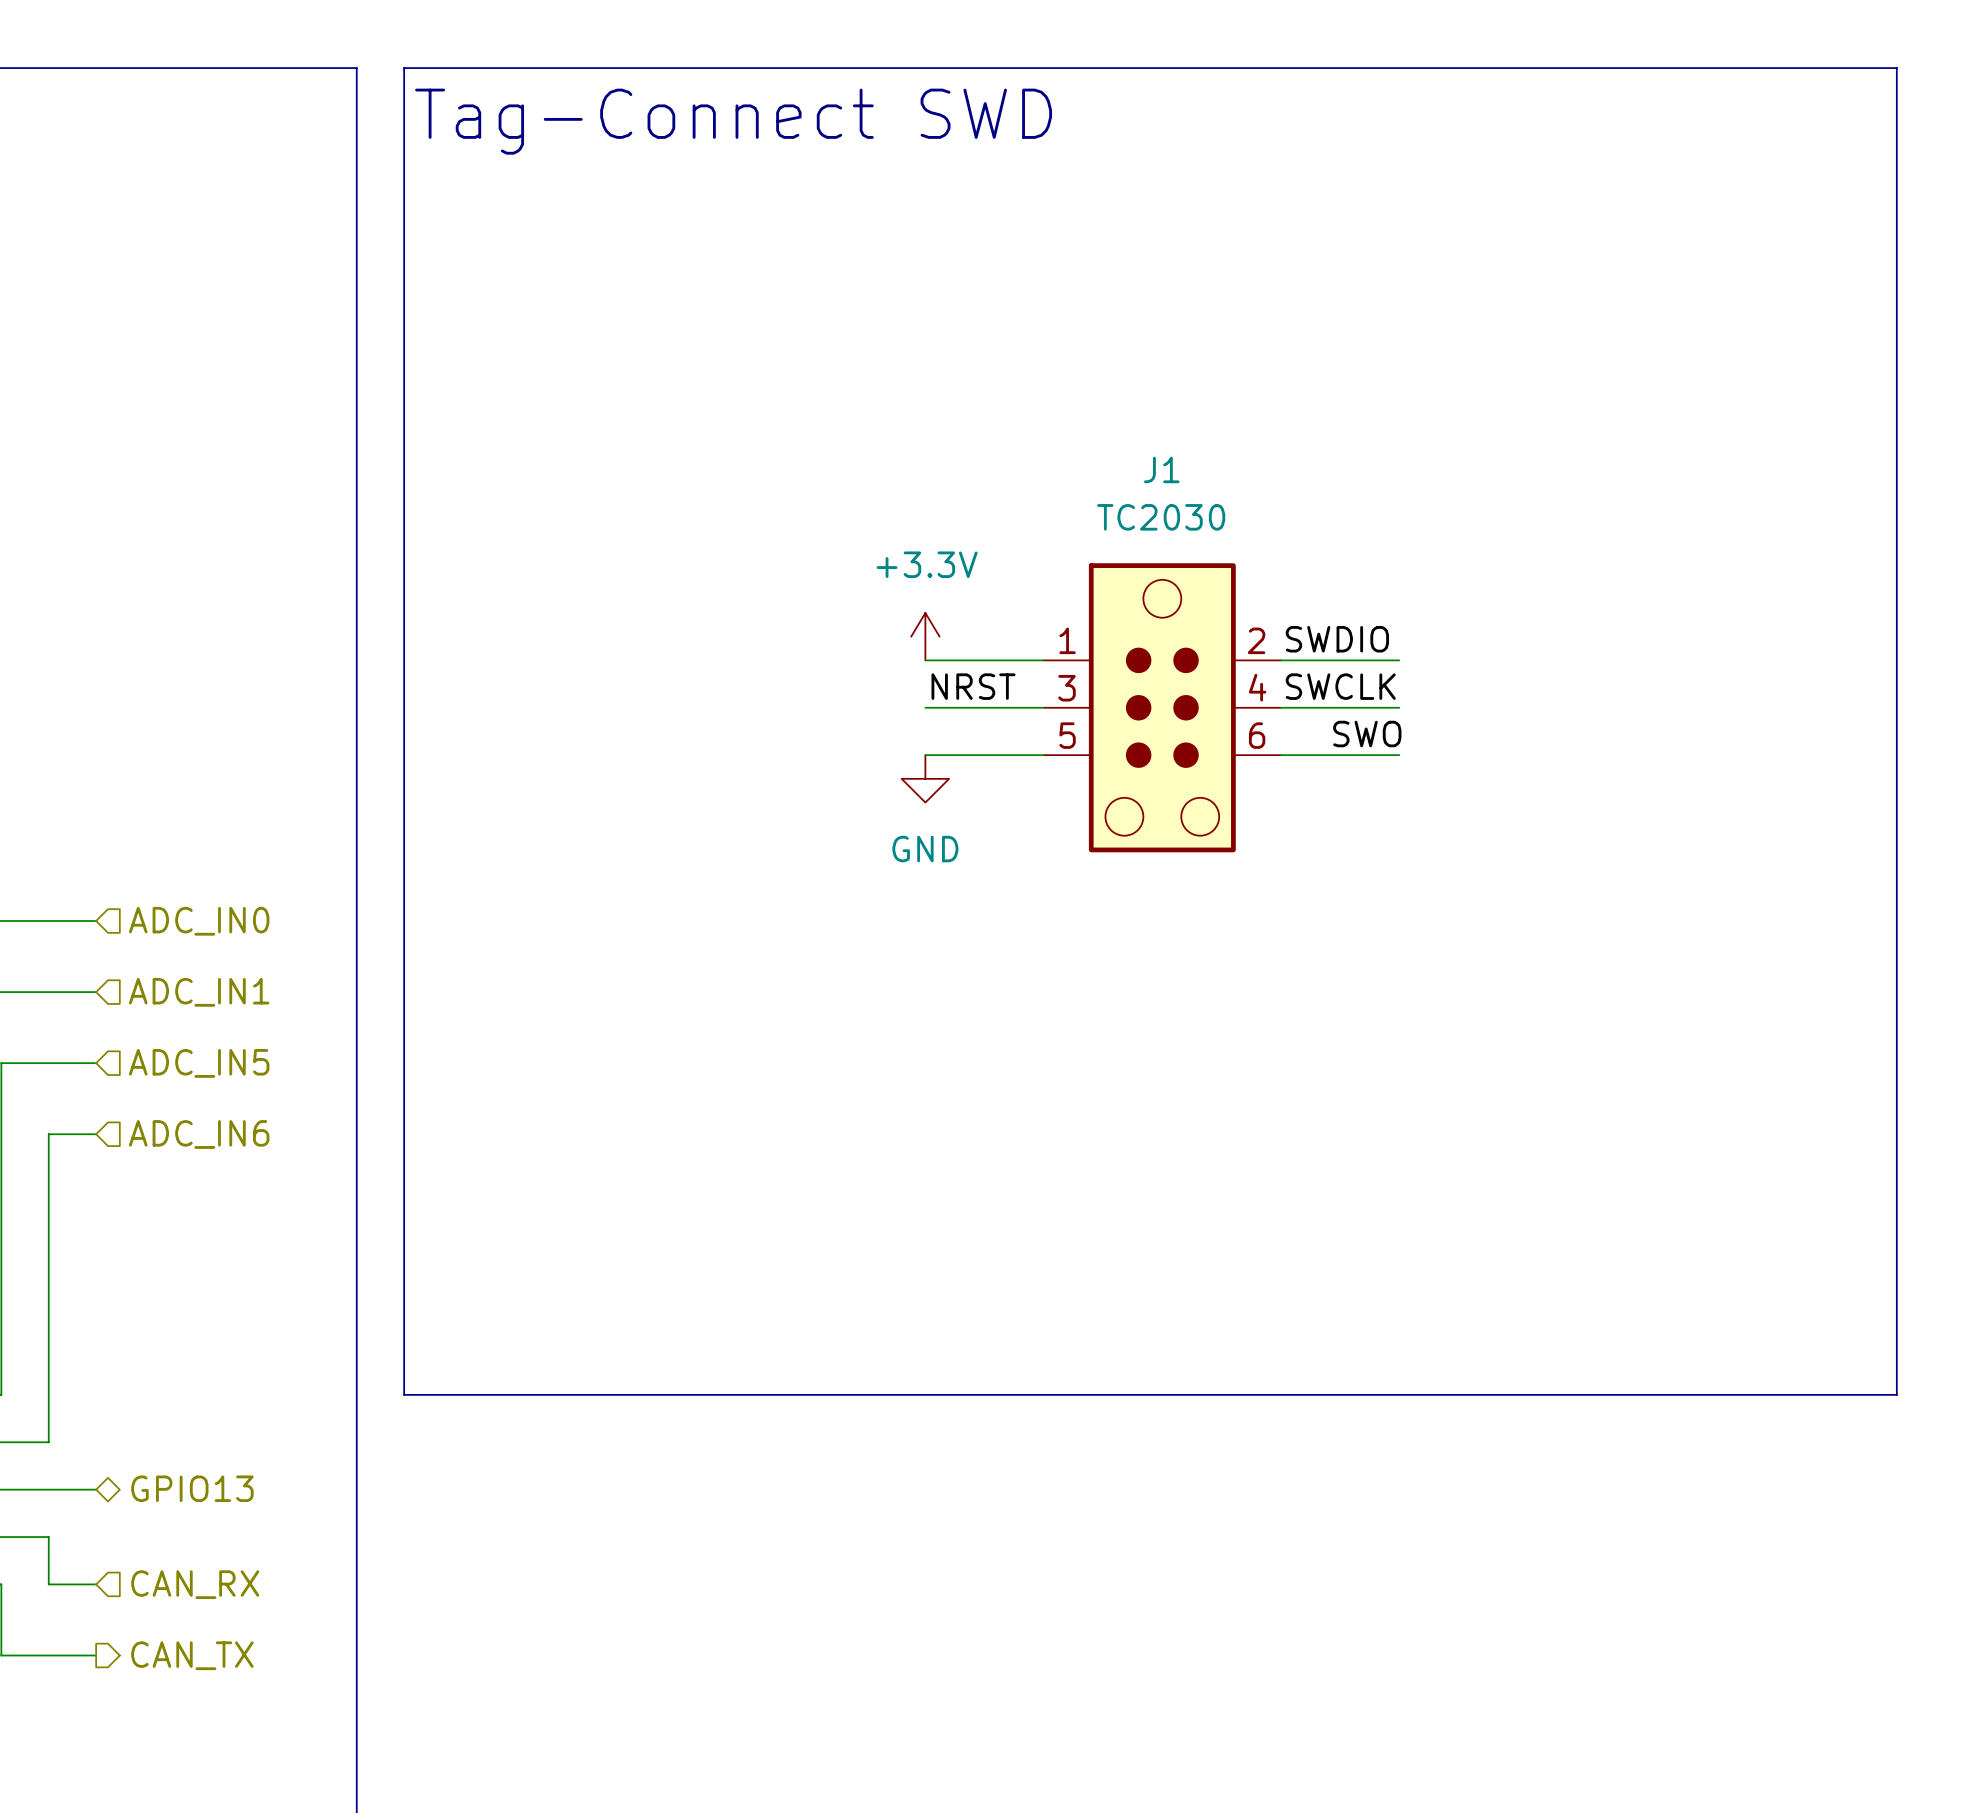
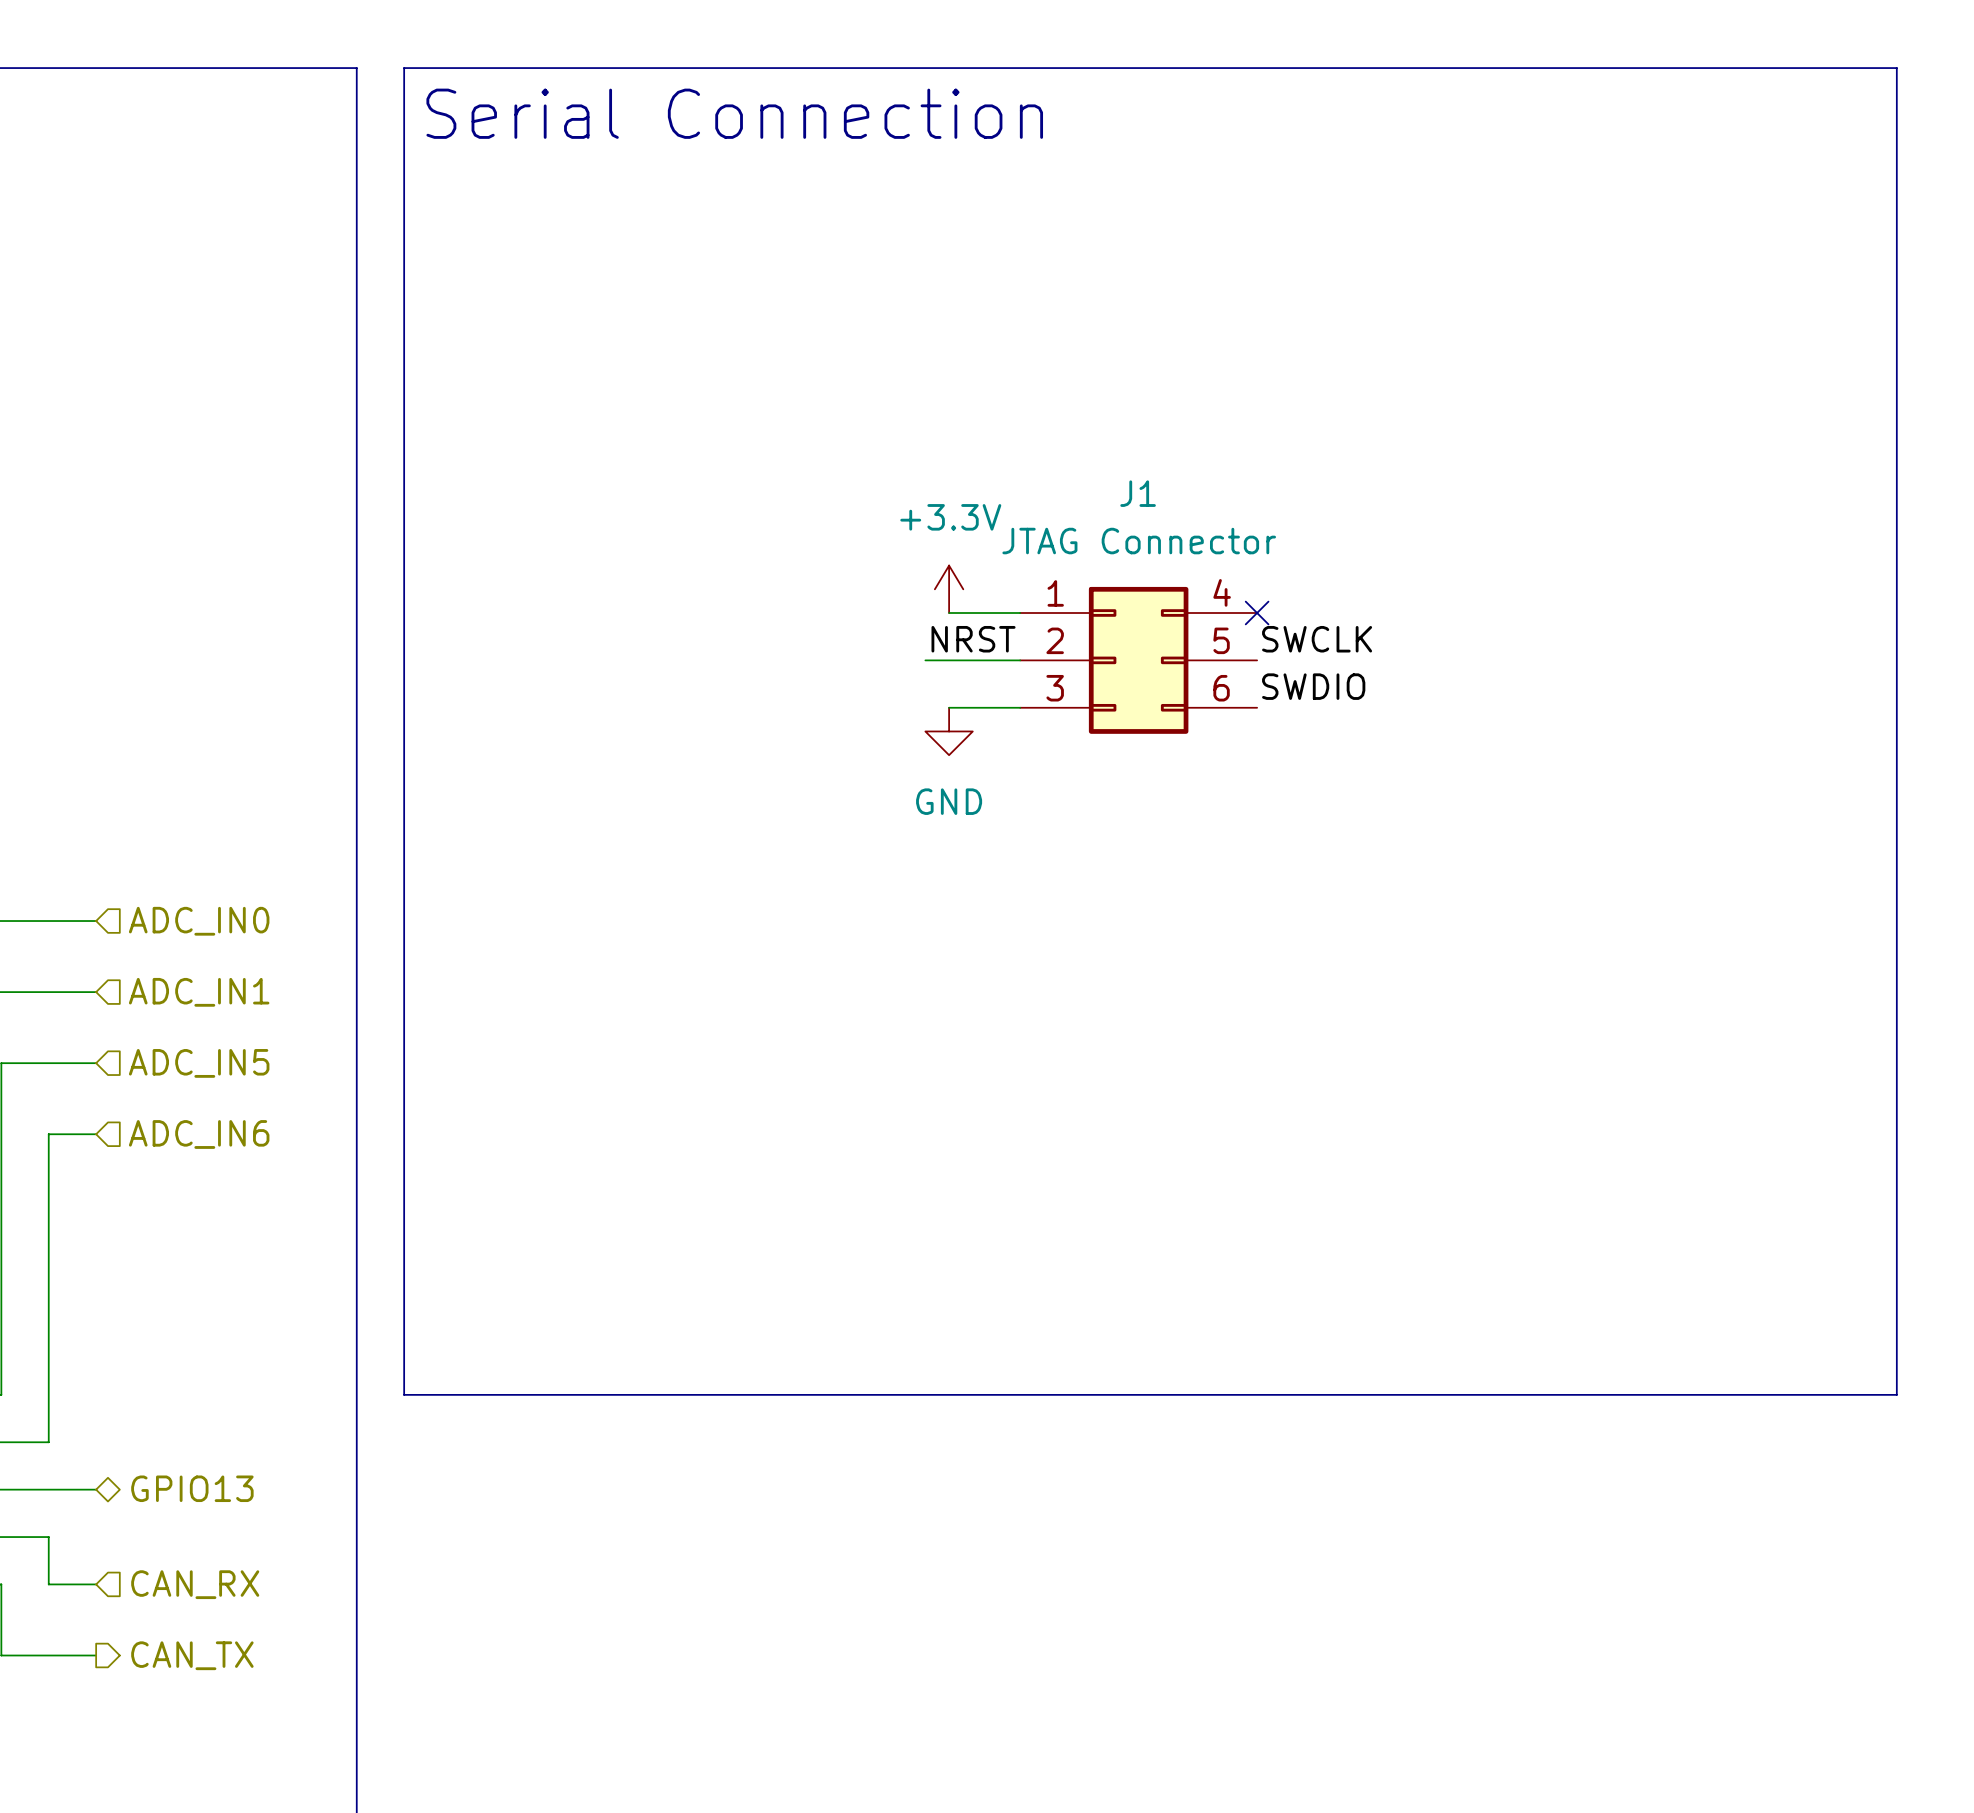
text: Tag-Connect SWD (733, 121) -> Serial Connection (734, 113)
J1 name position: J1 (1161, 469) -> J1 (1138, 493)
J1 value: TC2030 (1161, 517) -> JTAG Connector (1139, 541)
J1 symbol: [1043, 563, 1281, 853] -> [1020, 586, 1258, 734]
wire: none -> (949, 613) (1020, 613)
no-connect mark: none -> (1257, 613)
power symbol position: +3.3V (925, 636) -> +3.3V (949, 589)
label position: SWDIO (1337, 639) -> SWDIO (1313, 686)
wire: (1280, 660) (1399, 660) -> none
label position: NRST (973, 686) -> NRST (973, 639)
label position: SWCLK (1340, 686) -> SWCLK (1317, 639)
wire: (925, 707) (949, 707) -> none
wire: (1280, 707) (1399, 707) -> none
label: SWO (1367, 734) -> none
wire: (925, 755) (1043, 755) -> none
wire: (1280, 755) (1399, 755) -> none
power symbol position: GND (925, 778) -> GND (949, 731)

